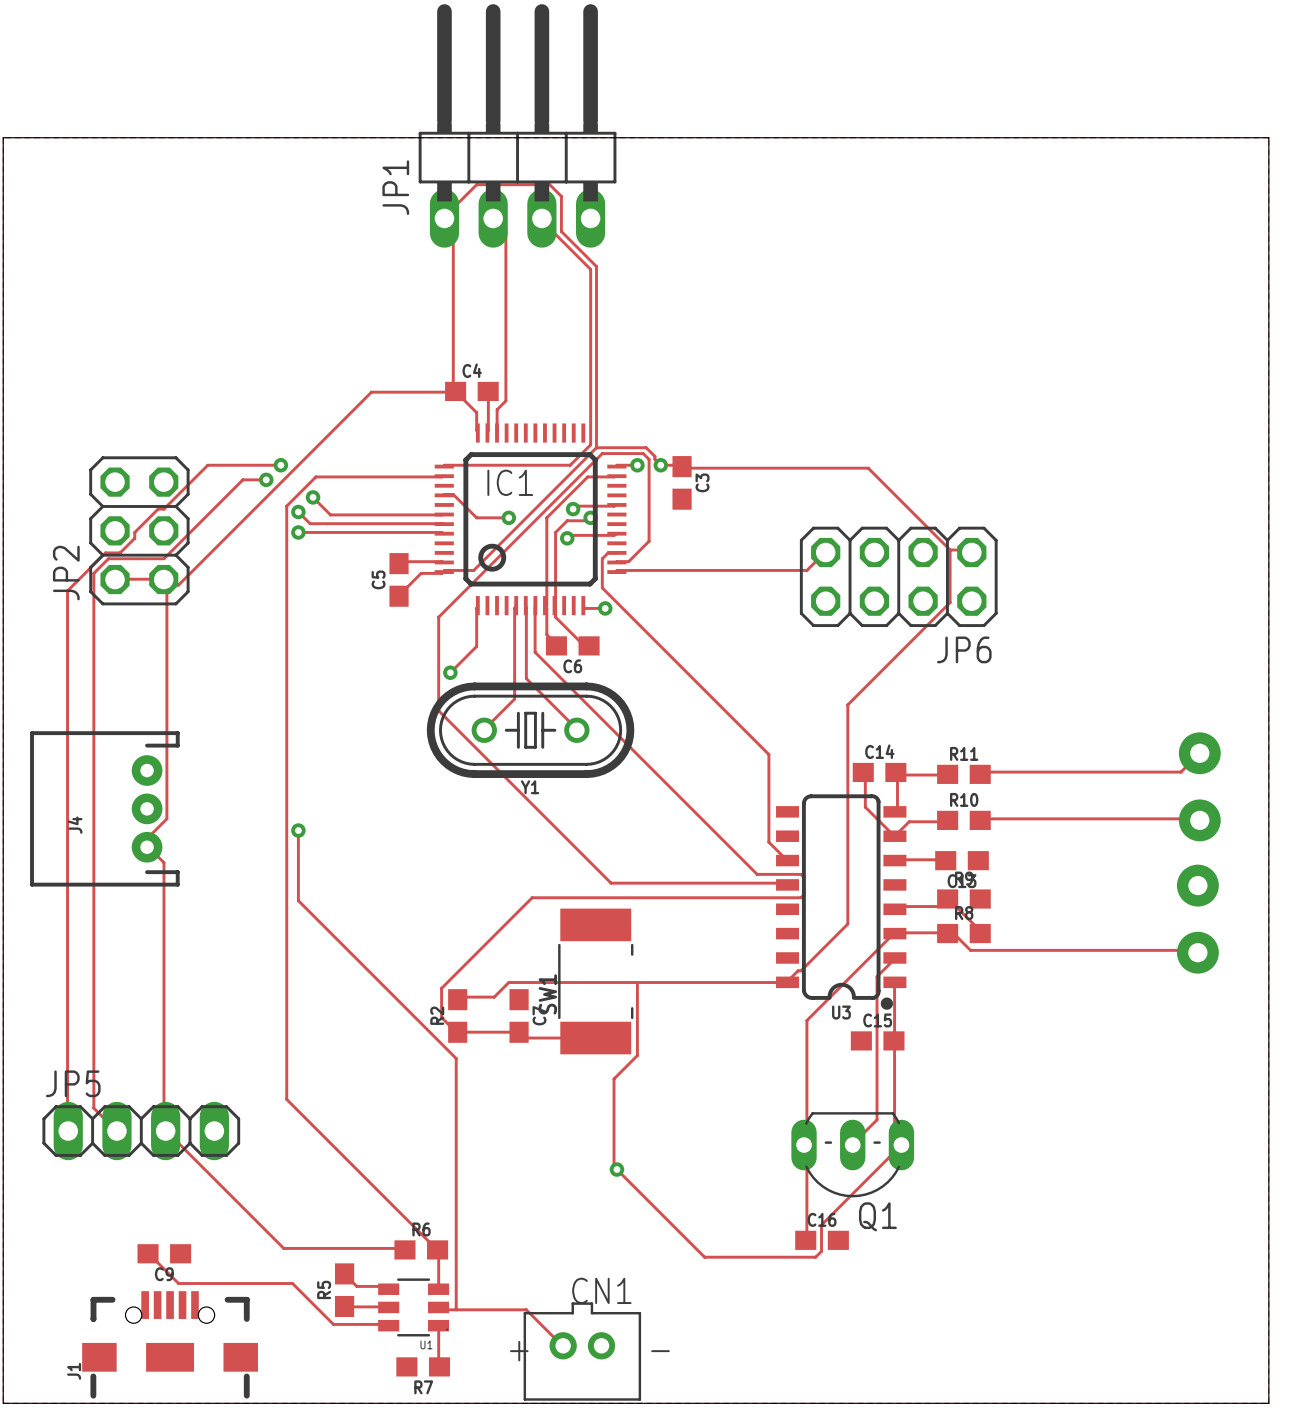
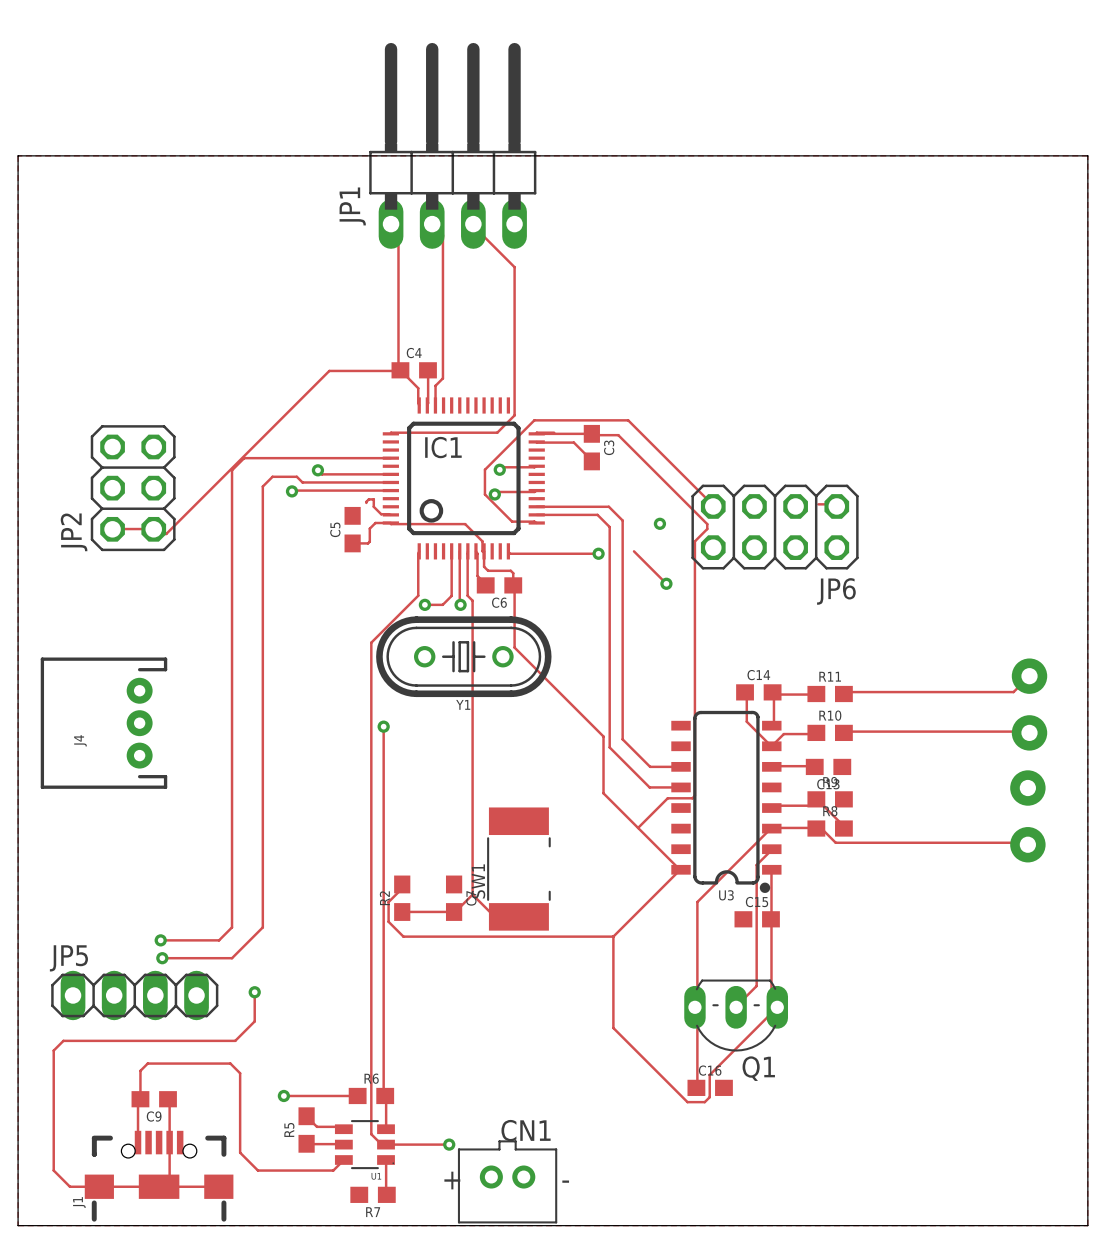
track: (444, 218) (476, 184) (549, 184) (561, 196) (561, 231) (596, 266) (596, 447) -> none
track: (596, 447) (646, 447) (660, 465) (682, 466) -> (536, 433) (591, 433)
track: (596, 447) (473, 570) (444, 570) (441, 573) (421, 573) (399, 596) -> (613, 936) (680, 869) (603, 793) (603, 736) (514, 647) (513, 573) (510, 570) (488, 570) (484, 566) (482, 541) (465, 524) (375, 522) (369, 528) (369, 541) (368, 543) (352, 543)
track: (280, 465) (207, 465) (163, 509) (158, 509) (134, 532) (134, 538) (120, 552) (105, 552) (67, 590) (68, 1131) -> none
via: (280, 465) -> none
via: (637, 465) -> none
via: (660, 465) -> none
track: (713, 468) (868, 468) (950, 549) (950, 602) (847, 704) (847, 924) (787, 982) -> (618, 435) (707, 524) (707, 529) (694, 541) (694, 781)
track: (444, 476) (315, 476) (286, 506) (286, 1099) (435, 1248) -> (383, 726) (383, 1094)
track: (616, 476) (587, 476) -> (536, 441) (573, 442) (591, 461)
track: (266, 479) (242, 479) (163, 558) (108, 558) (93, 573) (93, 1108) (116, 1131) -> none
via: (266, 479) -> none
track: (444, 495) (453, 494) (476, 517) (508, 517) -> (390, 458) (244, 458) (232, 470) (232, 927) (219, 940) (160, 940)
track: (313, 497) (330, 514) (444, 514) -> (317, 470) (321, 474) (390, 474)
via: (313, 497) -> none
via: none -> (317, 470)
track: (555, 509) (546, 517) (546, 605) (544, 605) -> none
track: (298, 512) (310, 523) (444, 524) -> (162, 958) (232, 958) (262, 927) (262, 486) (272, 476) (296, 476) (302, 482) (390, 482)
via: (298, 512) -> none
via: (508, 517) -> none
track: (590, 517) (587, 520) (567, 520) (555, 532) -> (484, 469) (484, 489)
via: (590, 517) -> none
track: (298, 532) (444, 533) -> (292, 491) (390, 490)
via: (298, 532) -> none
via: none -> (292, 491)
track: (555, 538) (555, 617) (581, 643) (587, 643) (589, 645) -> (484, 494) (512, 521) (536, 522)
track: (616, 552) (608, 552) (602, 558) (602, 587) (768, 754) (768, 842) (787, 860) -> (536, 506) (608, 506) (622, 520) (622, 739) (650, 766) (681, 766)
track: (825, 552) (806, 570) (616, 570) (616, 572) -> (713, 506) (628, 420) (534, 420) (512, 442)
track: (432, 561) (400, 561) (399, 563) -> (381, 514) (373, 506) (373, 499) (368, 499) (366, 502)
track: (616, 562) (628, 561) (649, 541) (649, 459) (643, 453) (602, 453) (438, 617) (438, 710) (611, 883) (786, 883) (787, 884) -> (536, 514) (597, 514) (609, 527) (609, 747) (649, 787) (681, 787)
via: none -> (659, 523)
track: (166, 585) (166, 818) (149, 836) (149, 845) (147, 847) (163, 862) (163, 1128) (283, 1248) (404, 1249) -> (283, 1095) (357, 1095)
track: (516, 605) (514, 699) (484, 730) -> (451, 551) (451, 595) (442, 604) (424, 604)
track: (525, 605) (526, 678) (576, 730) -> (459, 551) (460, 604)
track: none -> (634, 551) (666, 583)
track: none -> (526, 553) (598, 553)
via: (605, 608) -> none
via: none -> (598, 553)
via: none -> (666, 583)
track: (476, 646) (450, 672) -> (418, 585) (418, 595) (371, 642) (371, 1134) (383, 1146) (386, 1144) (449, 1144)
track: (535, 652) (757, 874) (801, 874) (803, 877) -> (467, 590) (467, 595) (472, 600) (472, 894)
via: none -> (460, 604)
via position: (450, 672) -> (424, 604)
via: none -> (383, 726)
track: (298, 830) (298, 900) (441, 1043) -> (402, 884) (400, 889) (388, 902) (388, 921)
via: (298, 830) -> none
track: (771, 897) (532, 897) (441, 988) (441, 1017) (457, 1032) -> (667, 798) (638, 827)
track: (637, 982) (637, 1055) (614, 1078) (614, 1169) (616, 1169) (704, 1257) (795, 1257) -> (613, 936) (613, 1028) (687, 1102)
track: (786, 982) (508, 982) (494, 997) (459, 997) (457, 999) -> none
track: none -> (472, 894) (454, 912)
track: (519, 1032) (523, 1038) (567, 1038) -> (472, 894) (494, 916)
track: (456, 1058) (456, 1309) -> (400, 934) (403, 936) (613, 936)
via: none -> (160, 940)
via: none -> (162, 958)
track: none -> (254, 992) (254, 1021) (235, 1040) (63, 1040) (53, 1050) (53, 1170) (69, 1186) (218, 1186)
via: none -> (254, 992)
via: (616, 1169) -> none
via: none -> (283, 1095)
track: (148, 1253) (178, 1283) (292, 1283) (333, 1324) (388, 1325) -> (138, 1142) (140, 1070) (147, 1063) (230, 1063) (240, 1073) (240, 1152) (257, 1170) (333, 1170) (343, 1160)
track: none -> (168, 1099) (169, 1100) (169, 1176) (159, 1186)
track: (438, 1307) (438, 1309) (526, 1309) (563, 1345) -> none
via: none -> (449, 1144)

